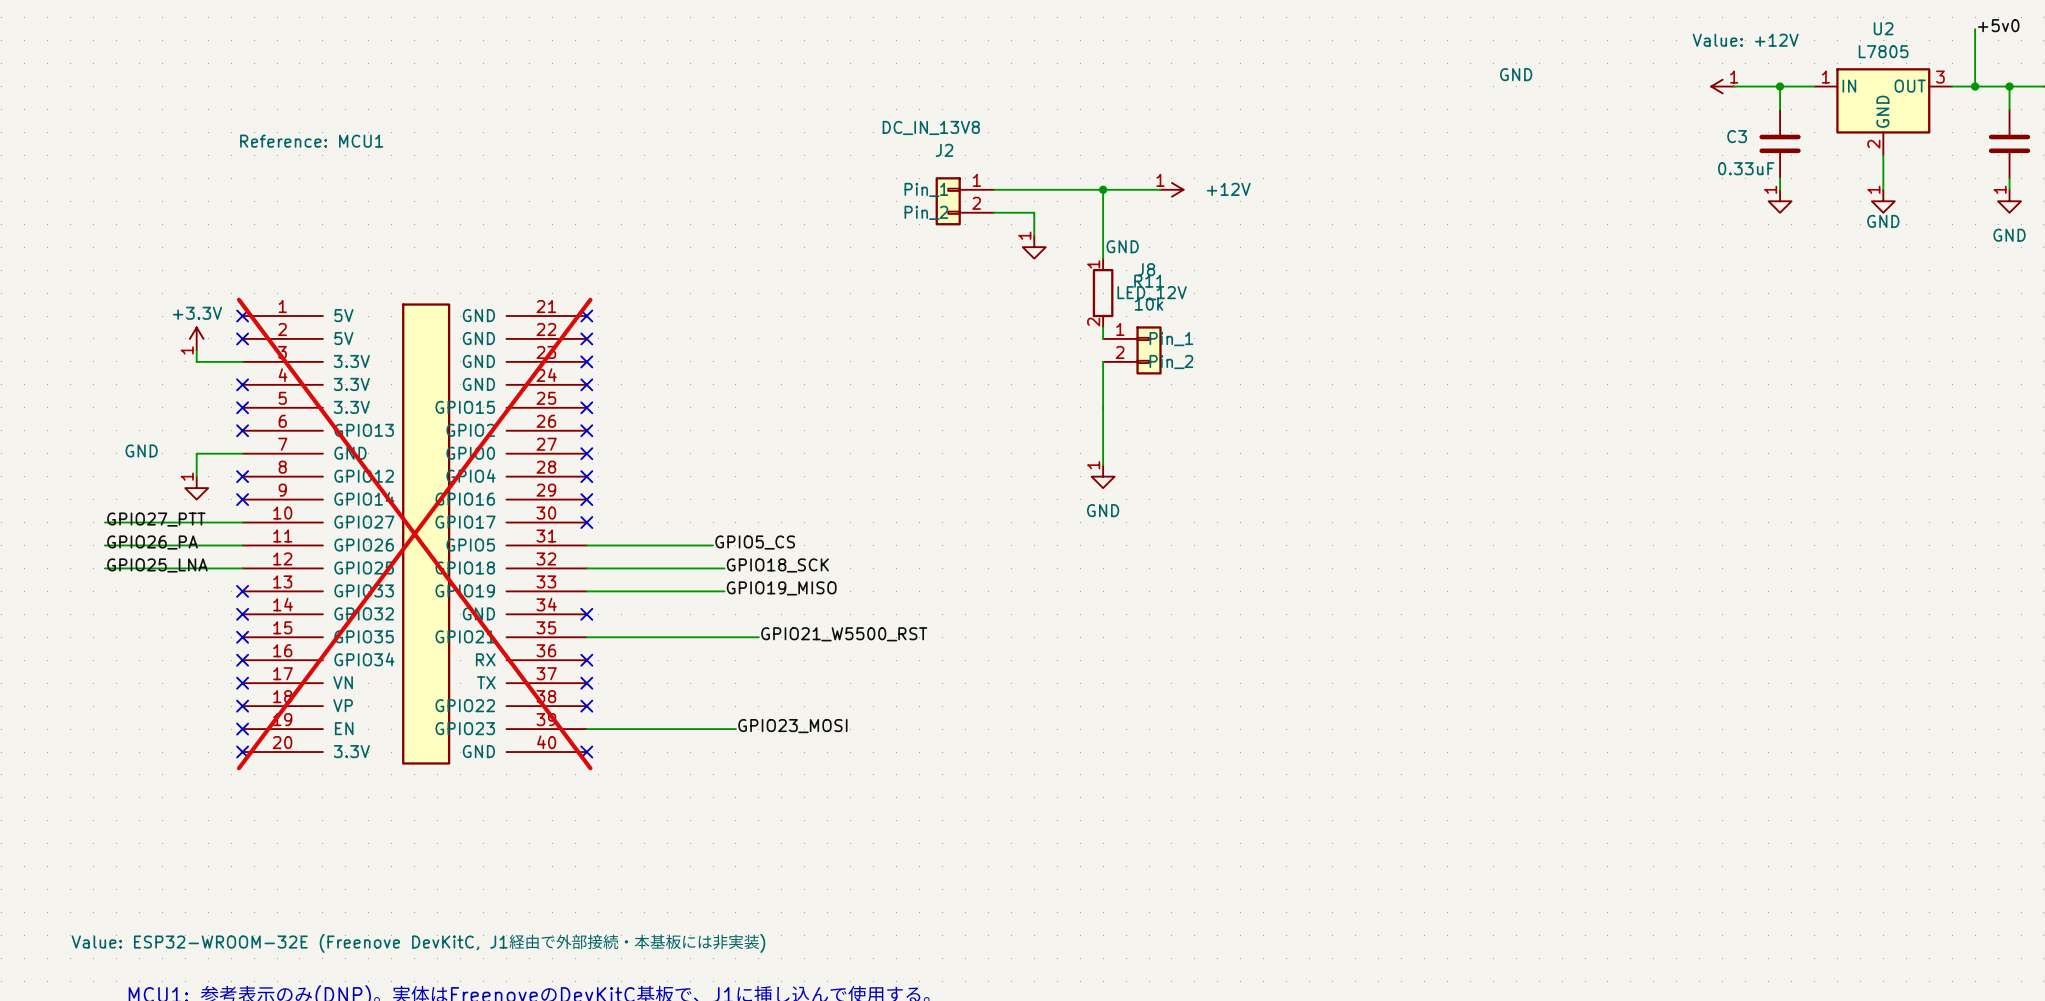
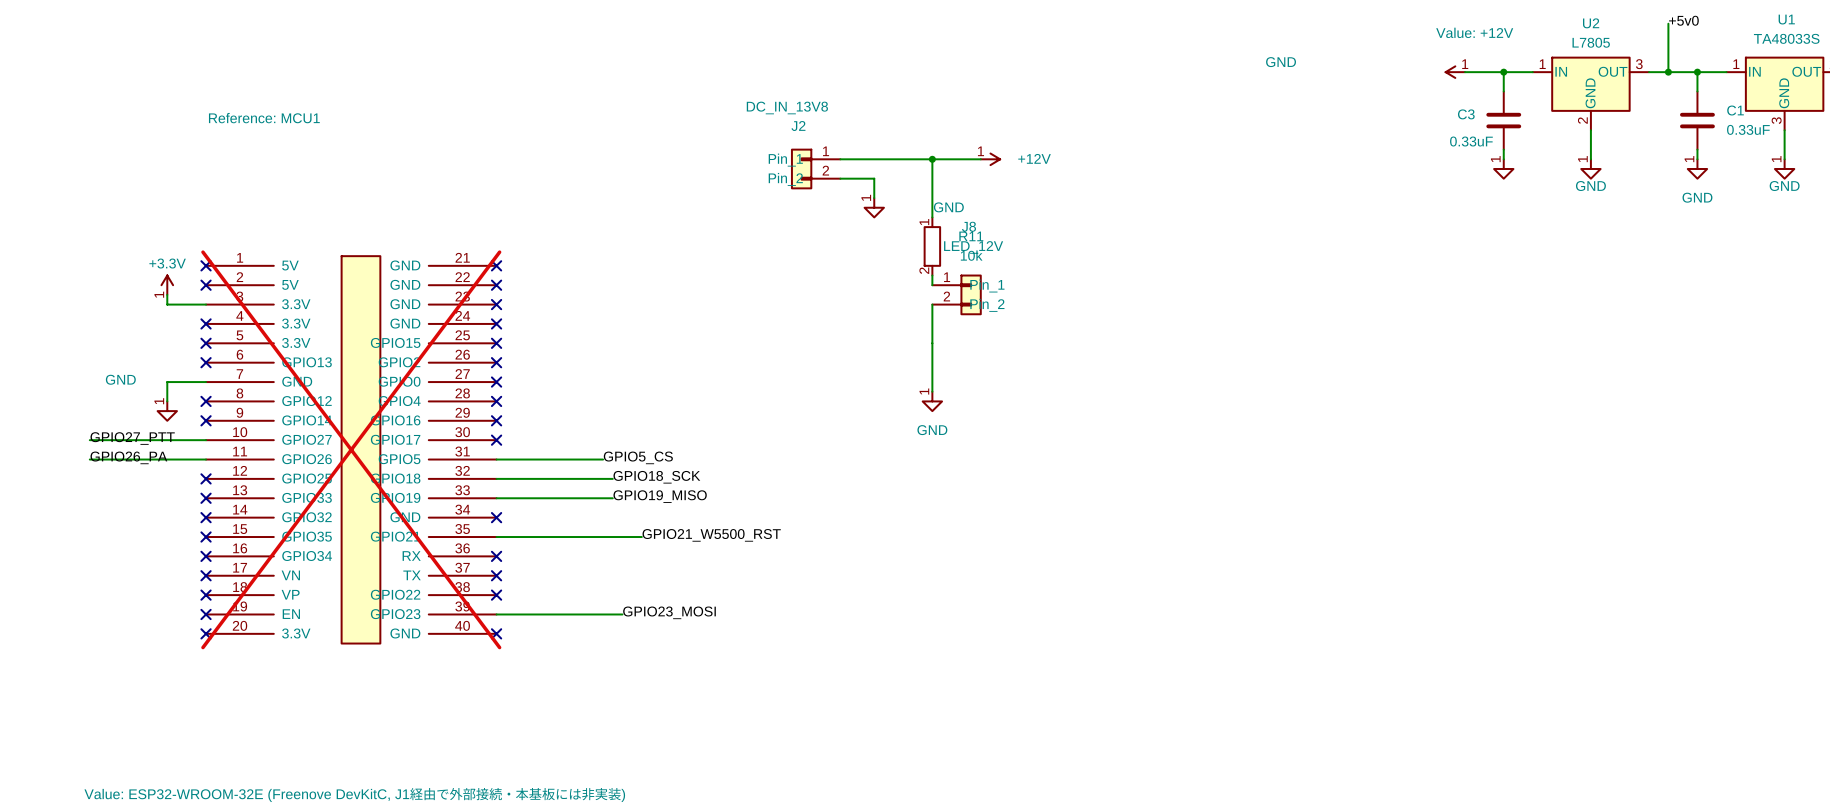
label: GPIO25_LNA (157, 565) -> none
wire: (104, 568) (242, 568) -> none
no-connect mark: none -> (206, 478)

